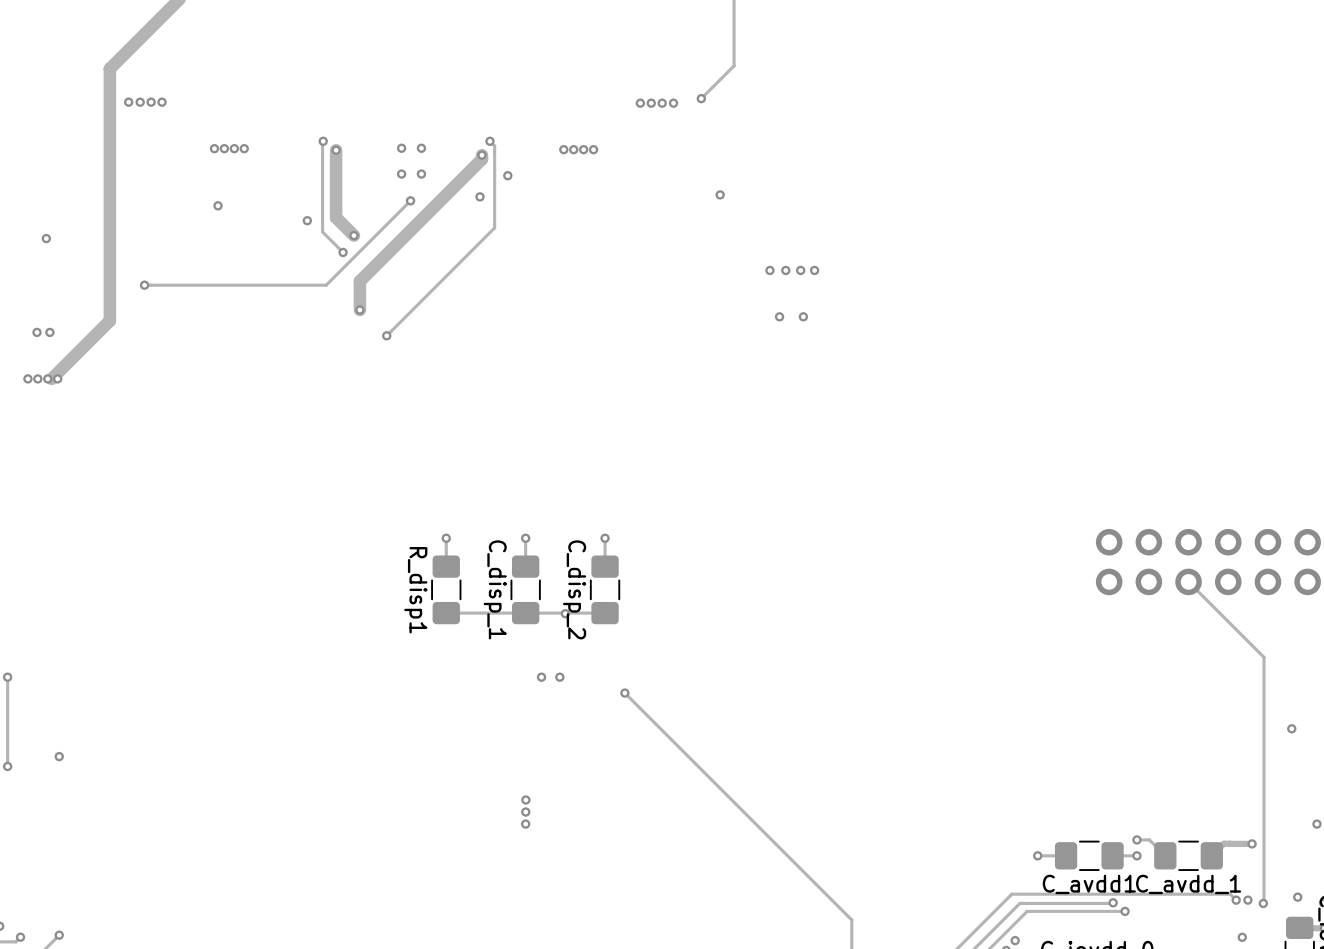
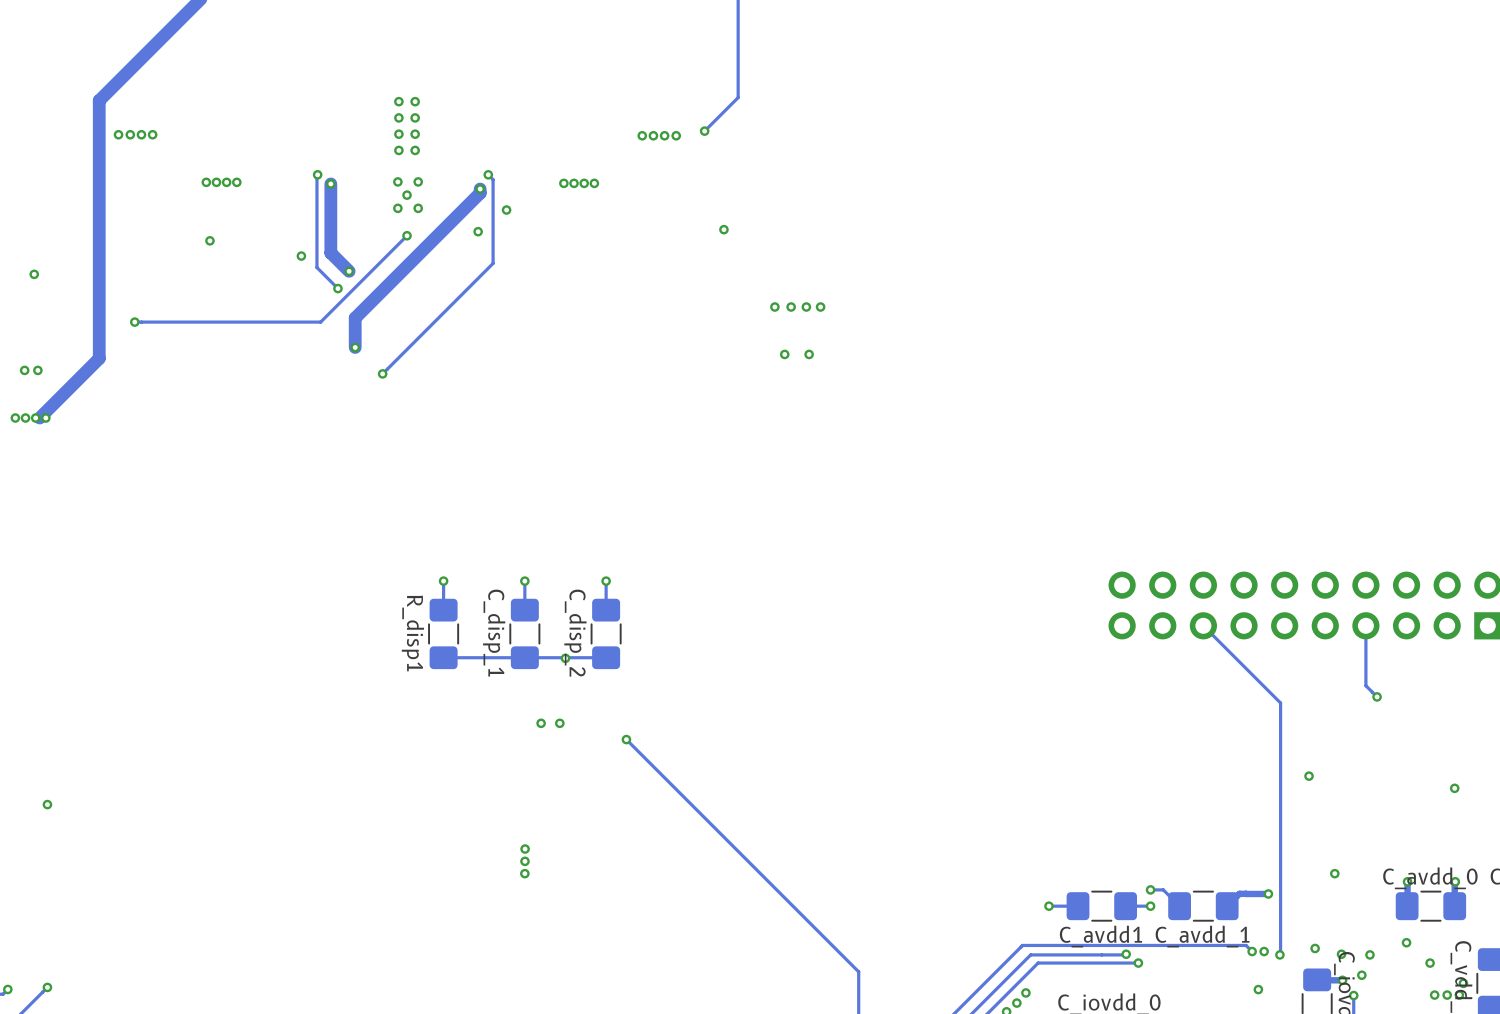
via: none -> (398, 101)
via: none -> (415, 101)
via: none -> (398, 117)
via: none -> (415, 117)
via: none -> (398, 134)
via: none -> (415, 134)
via: none -> (398, 150)
via: none -> (415, 150)
via: none -> (407, 195)

